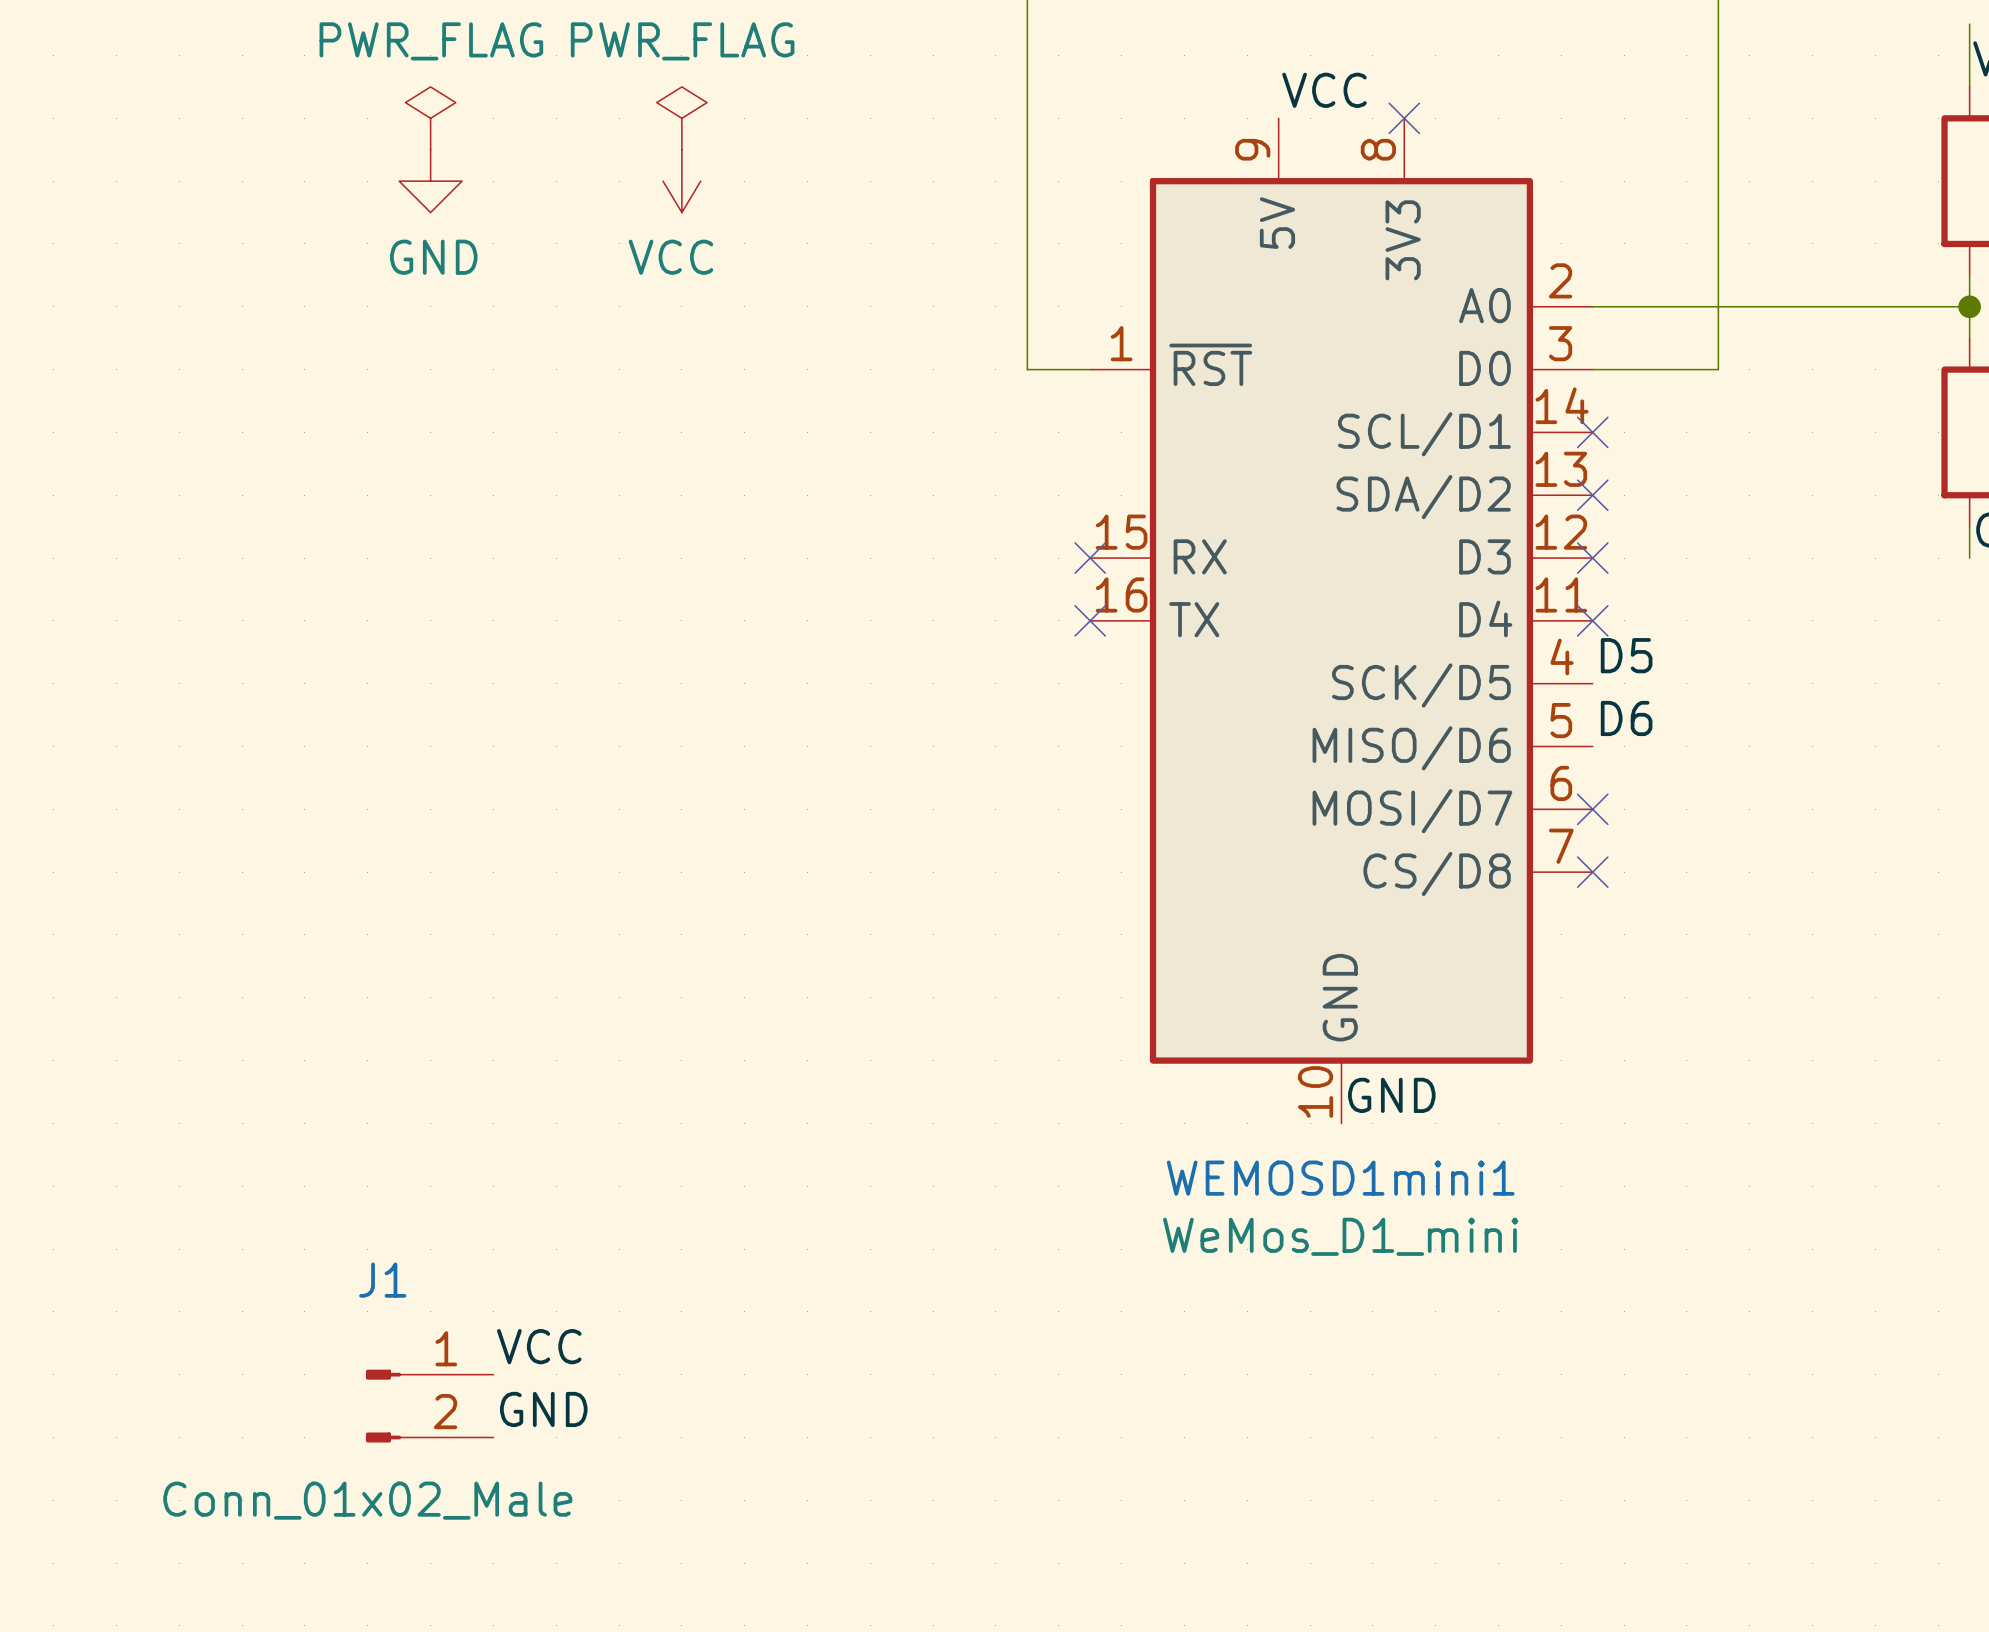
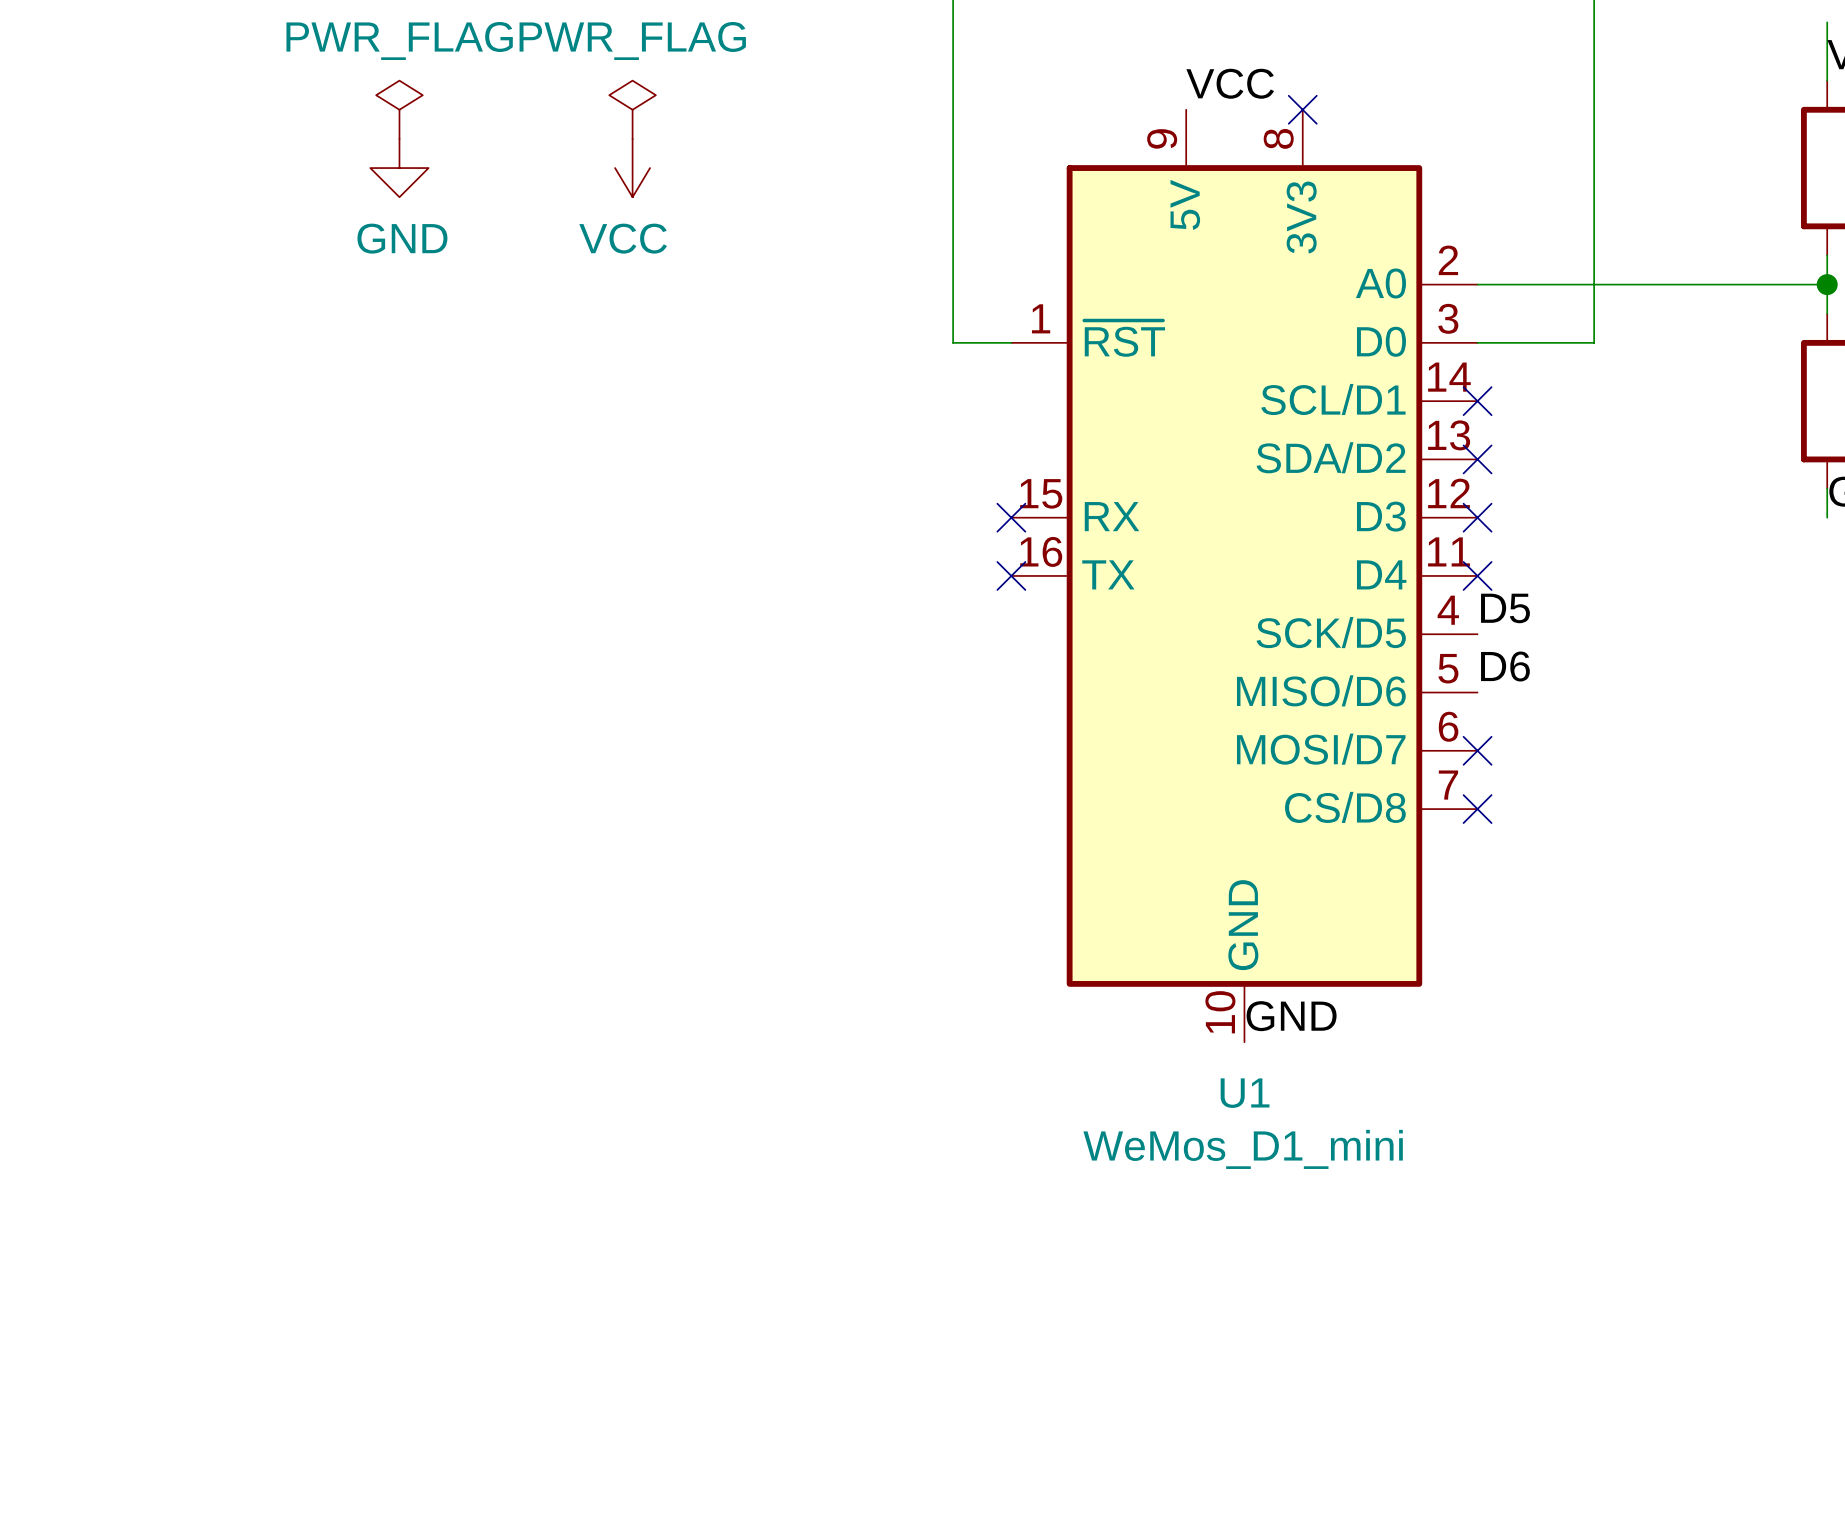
WEMOSD1mini1 name: WEMOSD1mini1 (1340, 1178) -> U1 (1245, 1093)
label: VCC (539, 1346) -> none
J1: Conn_01x02_Male (429, 1406) -> none
label: GND (543, 1409) -> none

